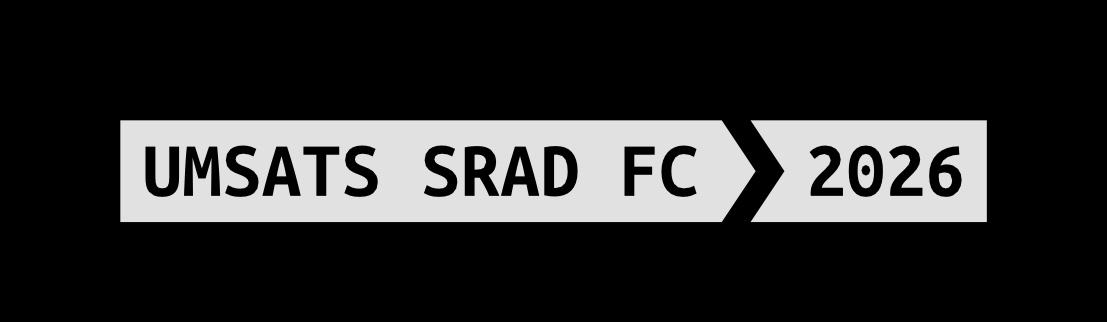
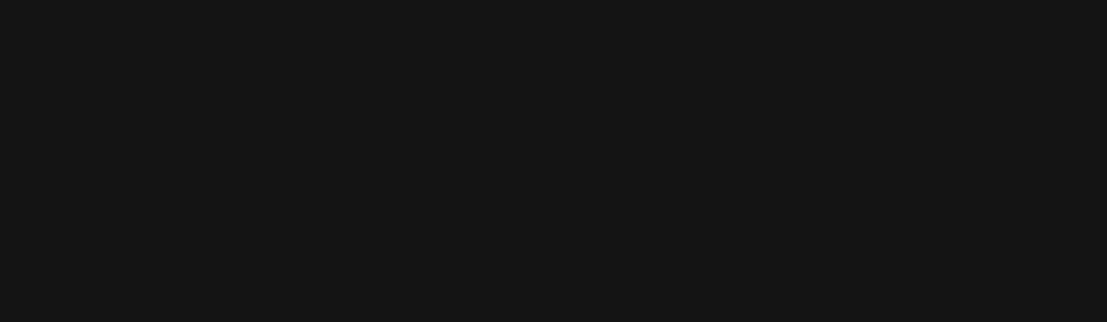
drawing: [120, 120, 987, 223] -> none

